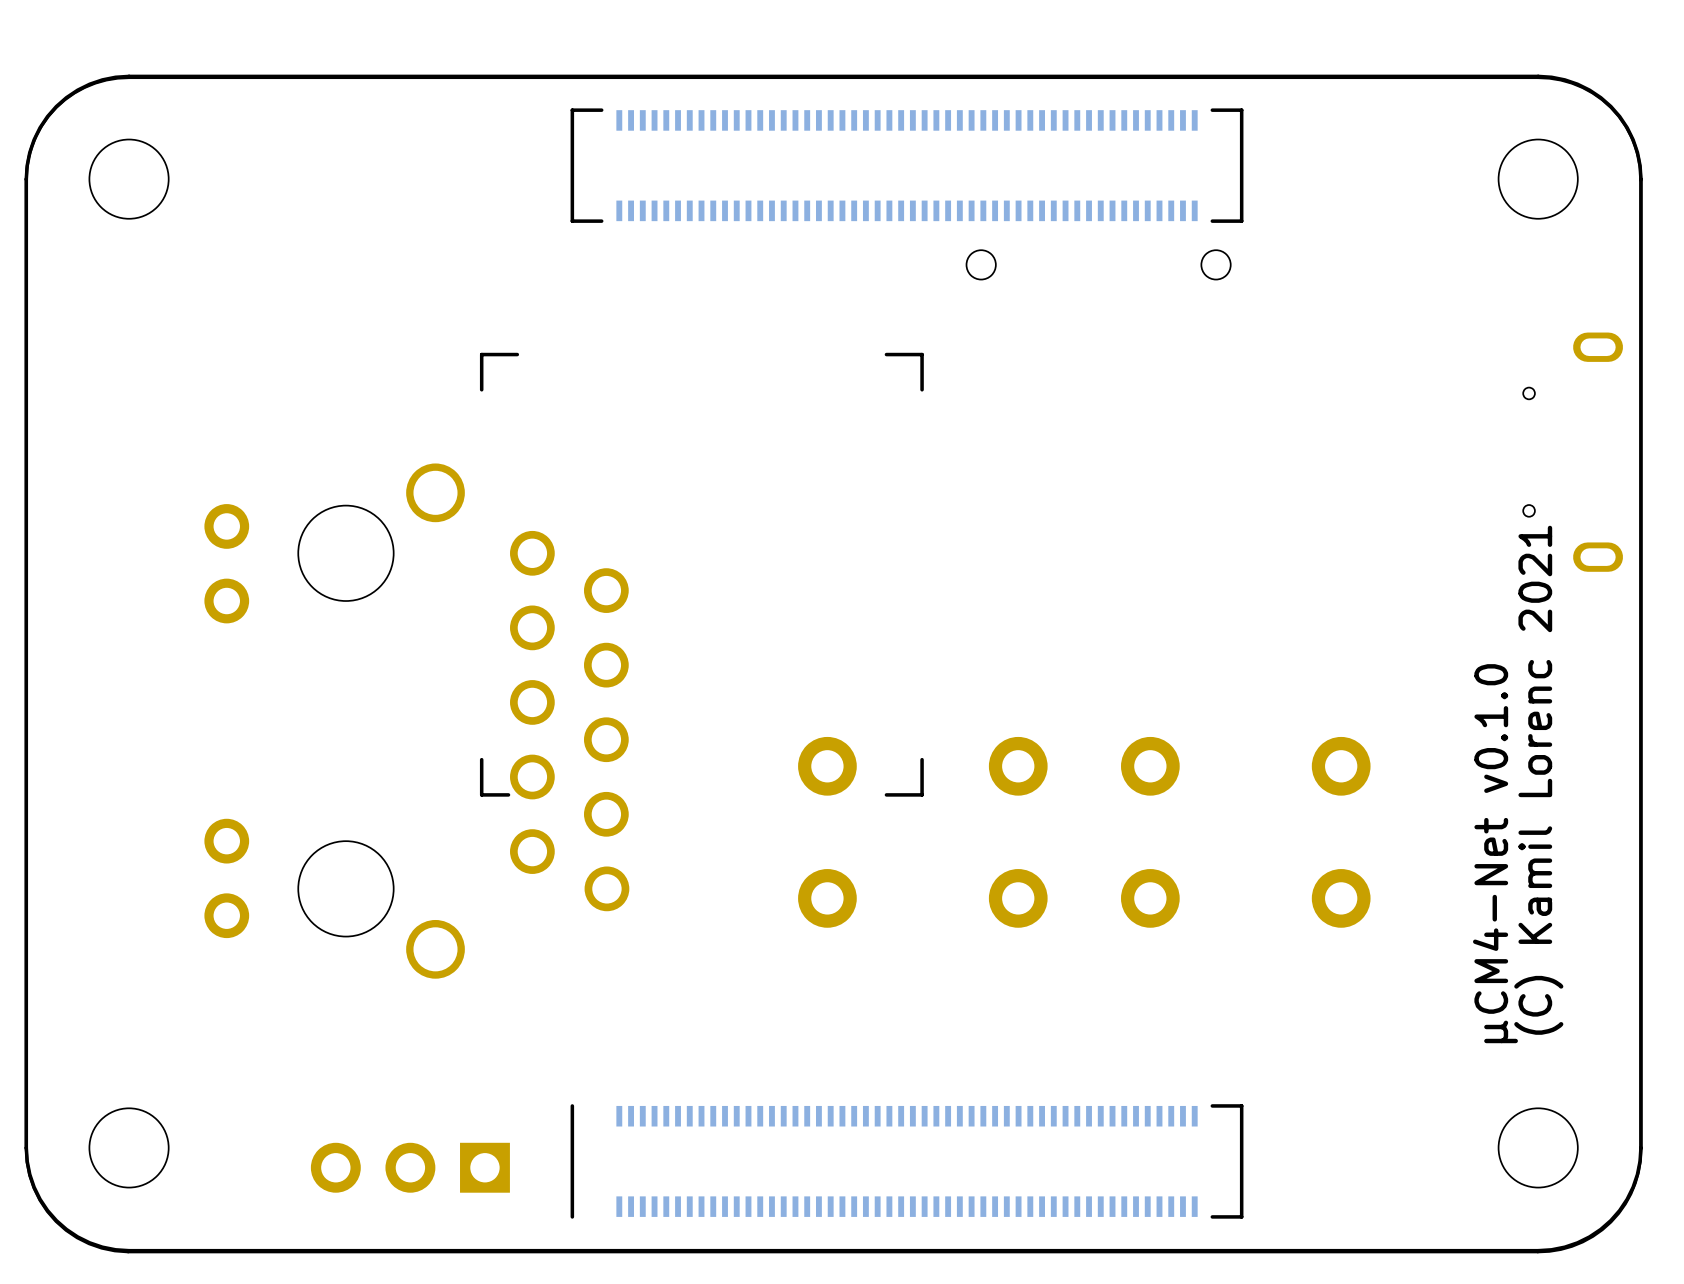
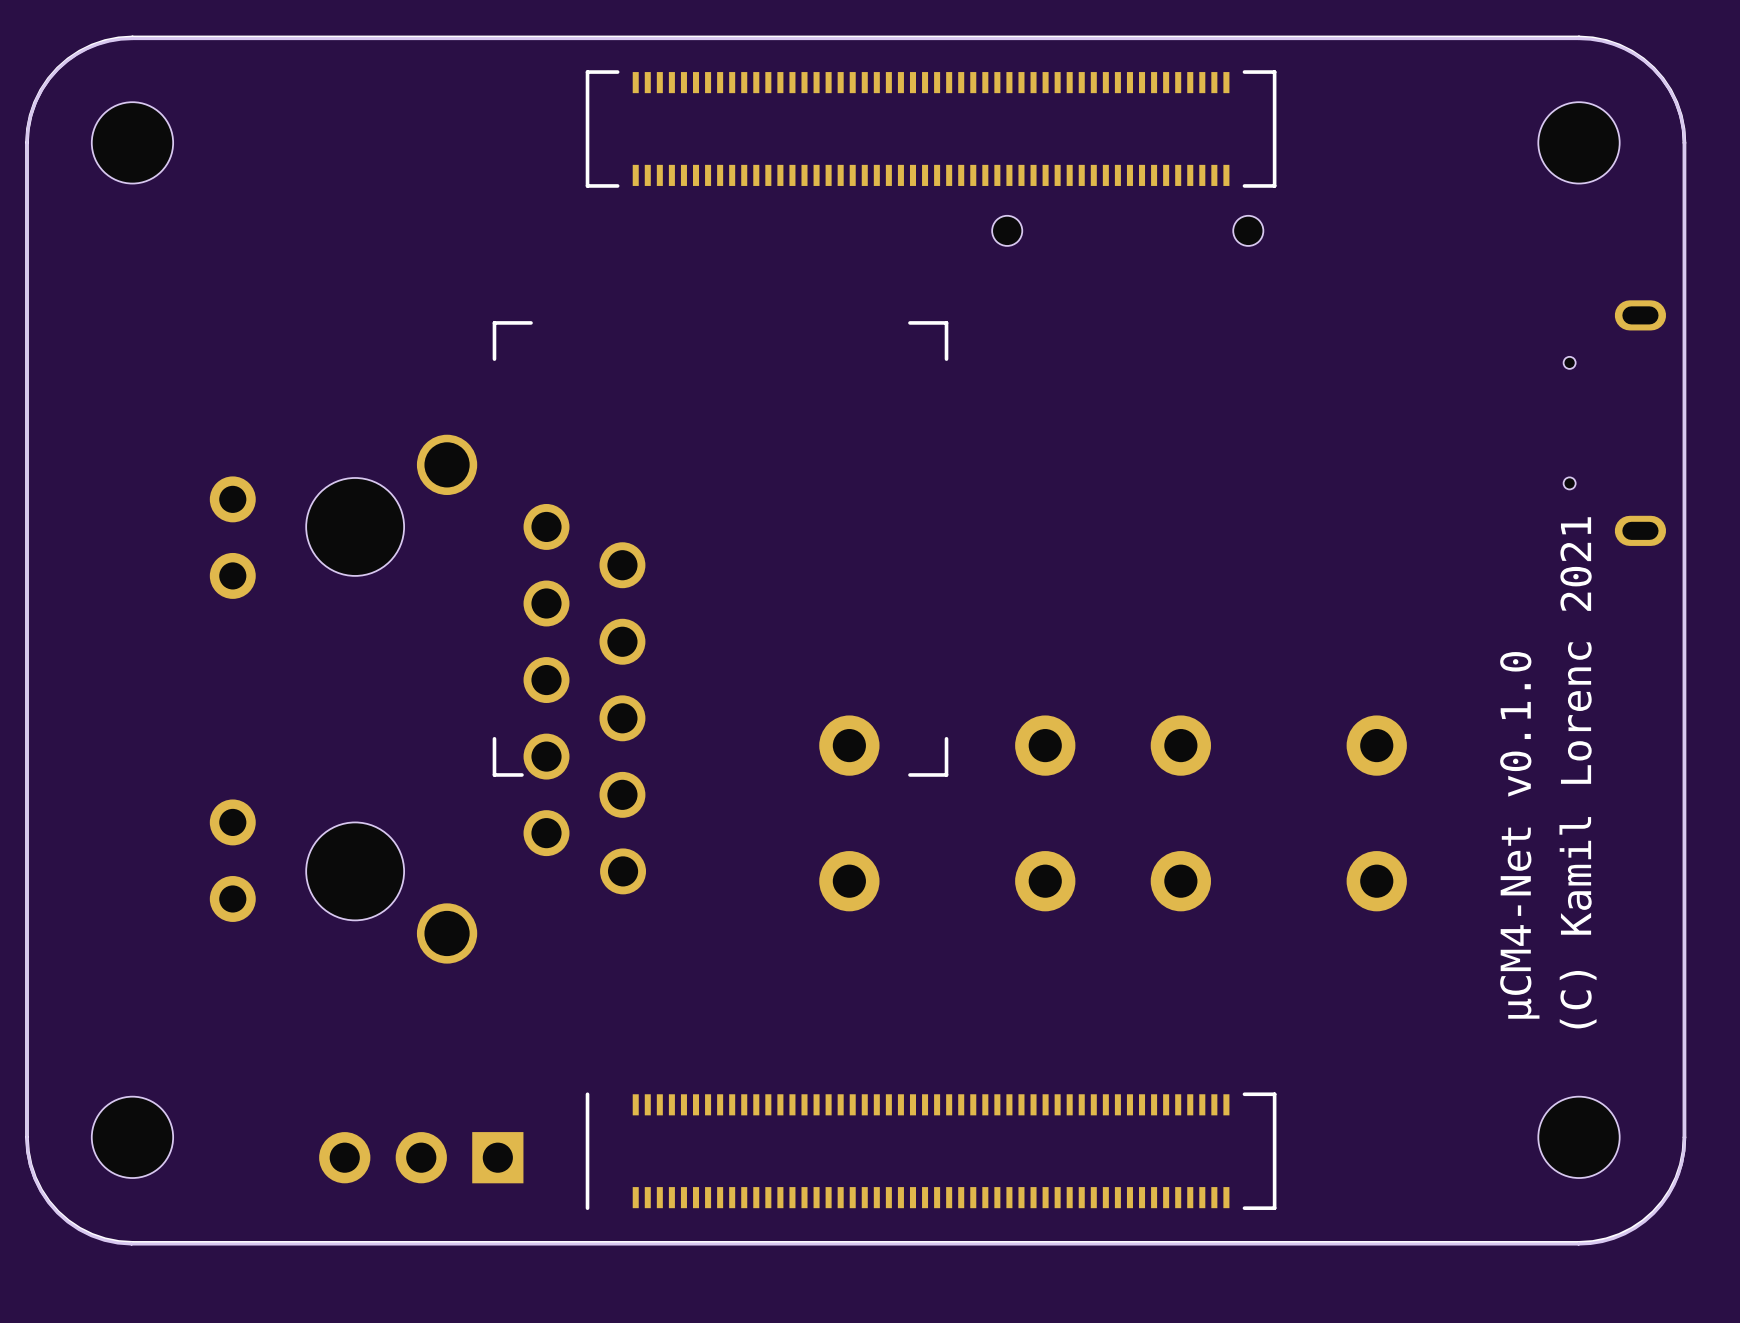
text position: (C) Kamil Lorenc 2021 (1538, 780) -> (C) Kamil Lorenc 2021 (1578, 772)
text position: µCM4-Net v0.1.0 (1495, 853) -> µCM4-Net v0.1.0 (1519, 835)

